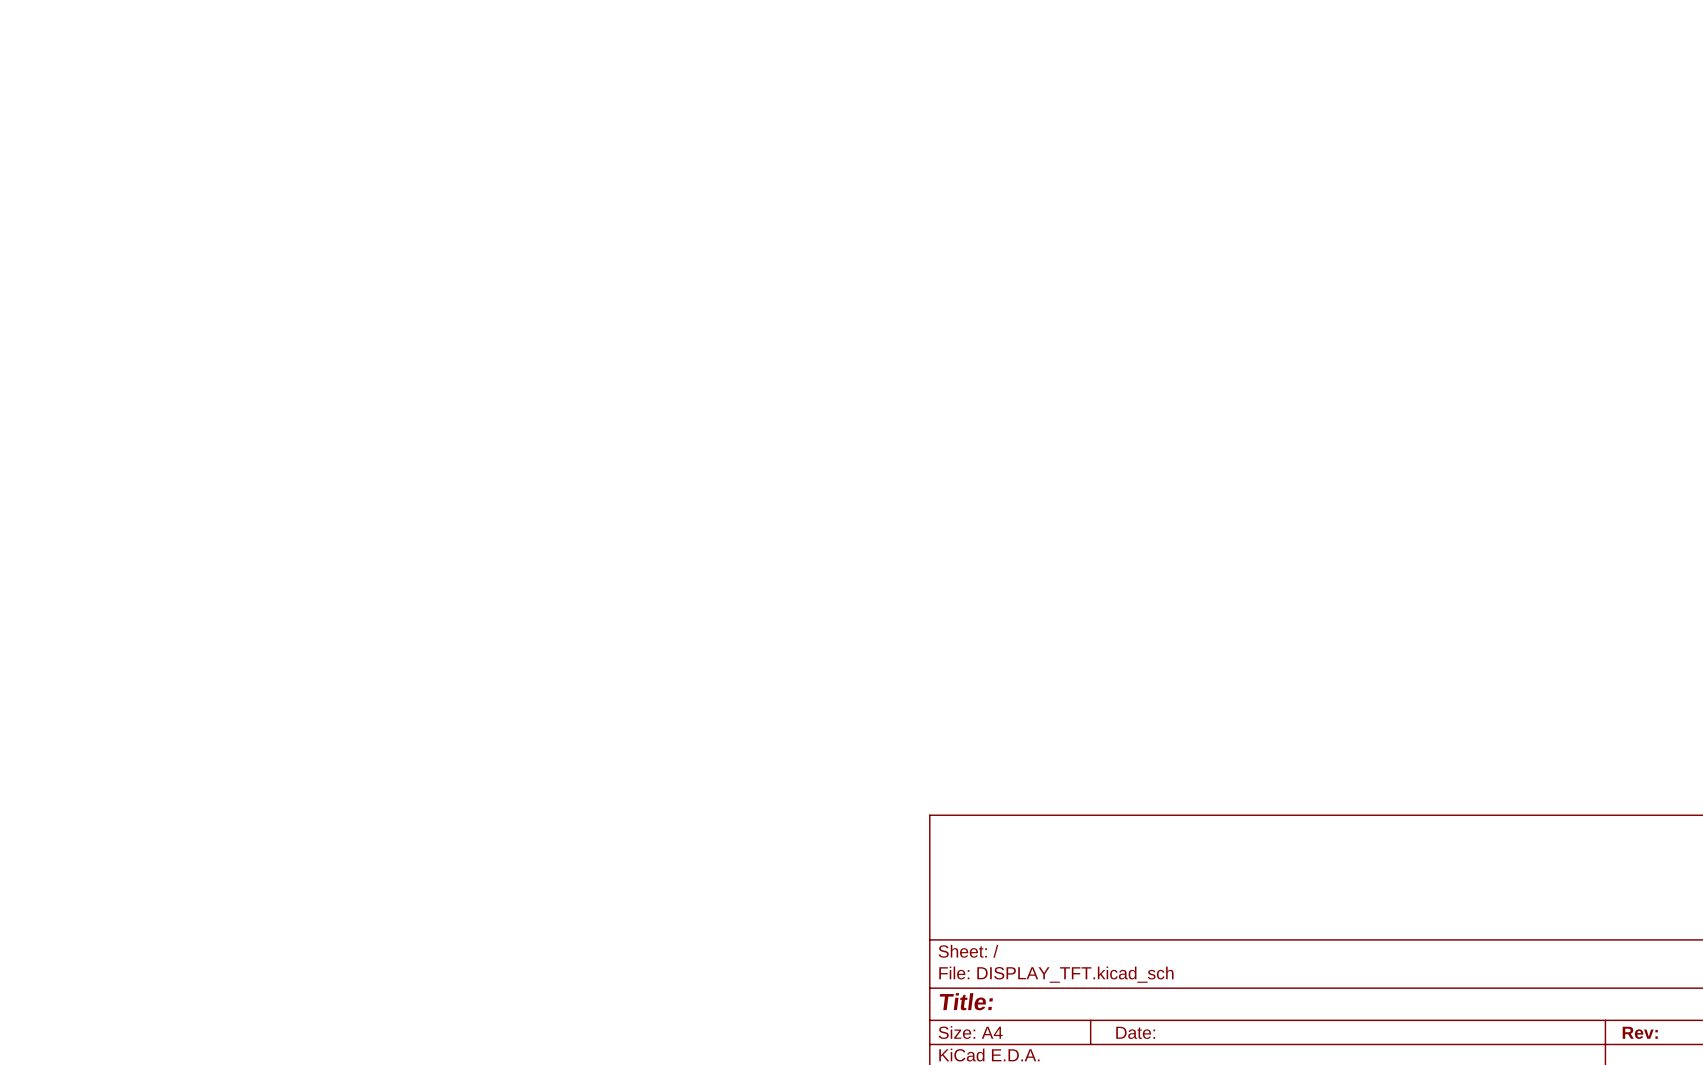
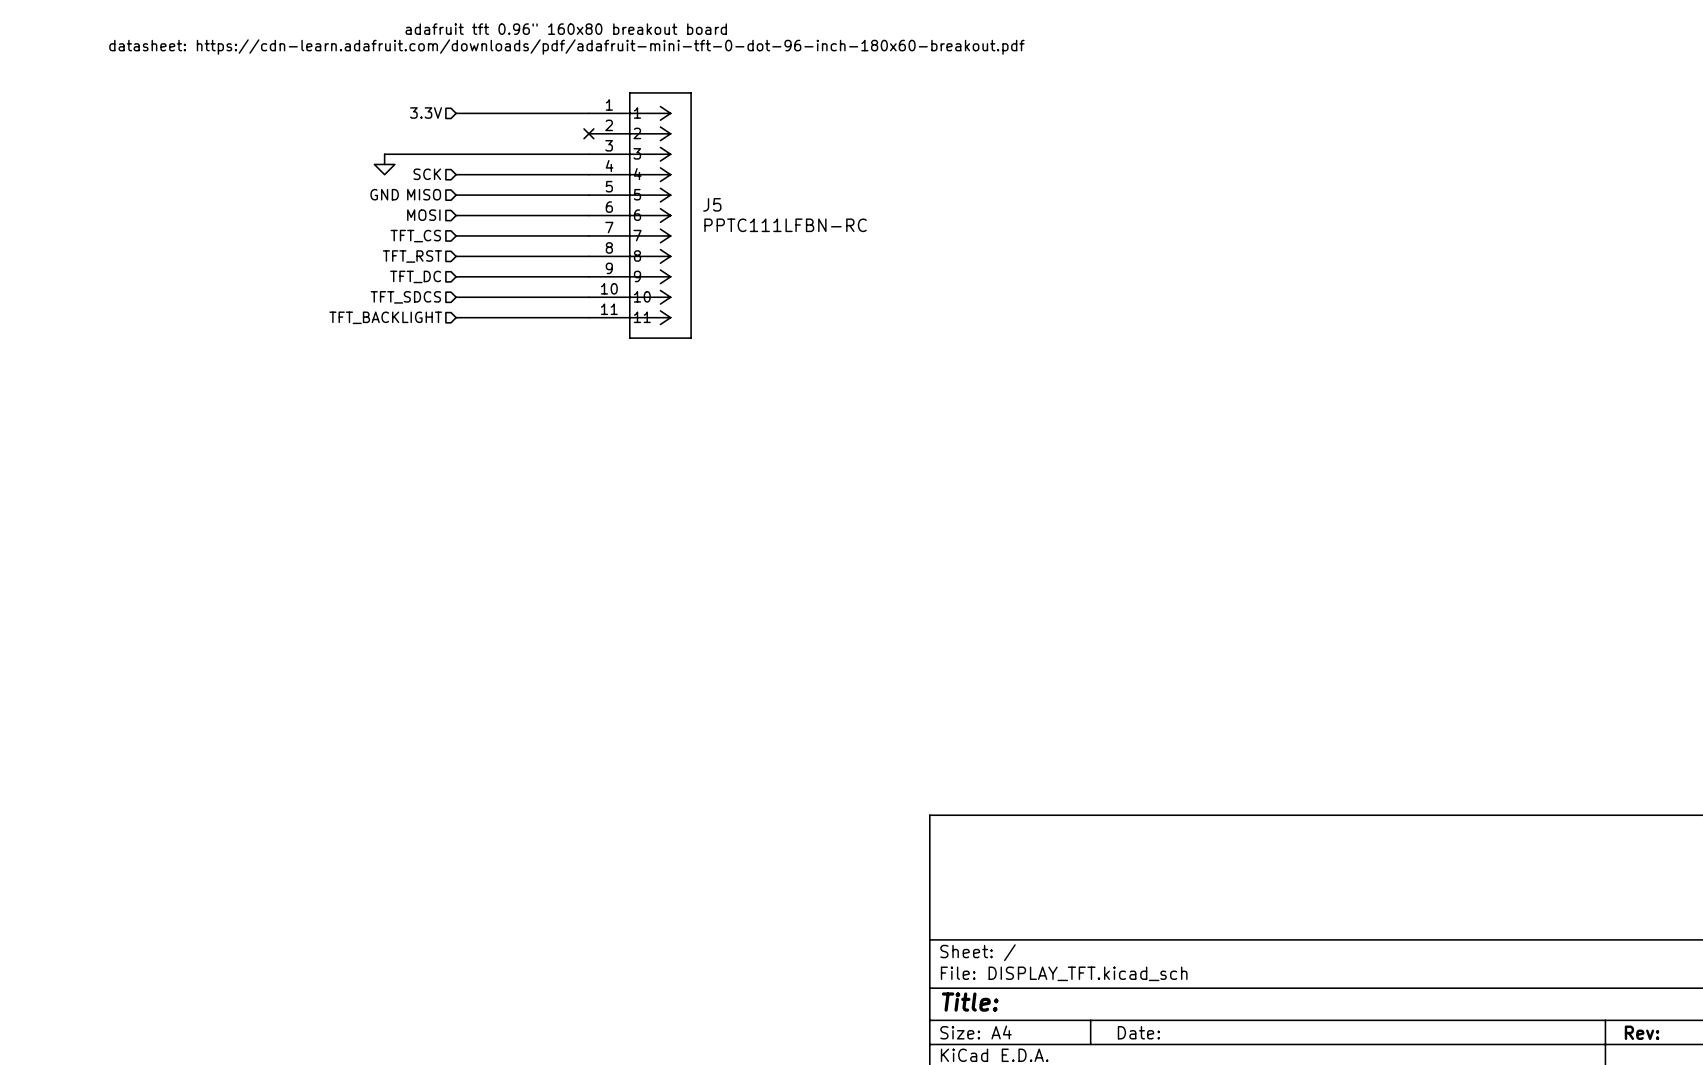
text: none -> adafruit tft 0.96" 160x80 breakout board (566, 29)
text: none -> datasheet: https://cdn-learn.adafruit.com/downloads/pdf/adafruit-mini-tft-0-dot-96-inch-180x60-breakout.pdf (566, 47)
hierarchical label: none -> 3.3V (426, 113)
wire: none -> (456, 113) (588, 113)
no-connect mark: none -> (588, 133)
wire: none -> (384, 154) (588, 154)
power symbol: none -> GND (384, 164)
hierarchical label: none -> SCK (427, 174)
wire: none -> (456, 174) (588, 174)
hierarchical label: none -> MISO (424, 194)
wire: none -> (456, 195) (588, 195)
hierarchical label: none -> MOSI (423, 215)
wire: none -> (456, 215) (588, 215)
J5: none -> PPTC111LFBN-RC (640, 215)
wire: none -> (456, 235) (588, 235)
hierarchical label: none -> TFT_CS (415, 236)
wire: none -> (456, 256) (588, 256)
hierarchical label: none -> TFT_RST (412, 256)
wire: none -> (456, 276) (588, 276)
hierarchical label: none -> TFT_DC (415, 276)
wire: none -> (456, 297) (588, 297)
hierarchical label: none -> TFT_SDCS (405, 297)
wire: none -> (456, 317) (588, 317)
hierarchical label: none -> TFT_BACKLIGHT (385, 317)

